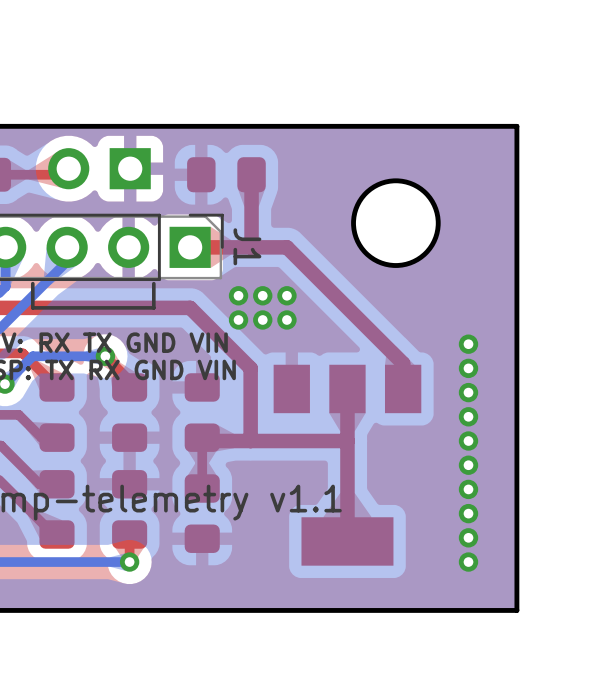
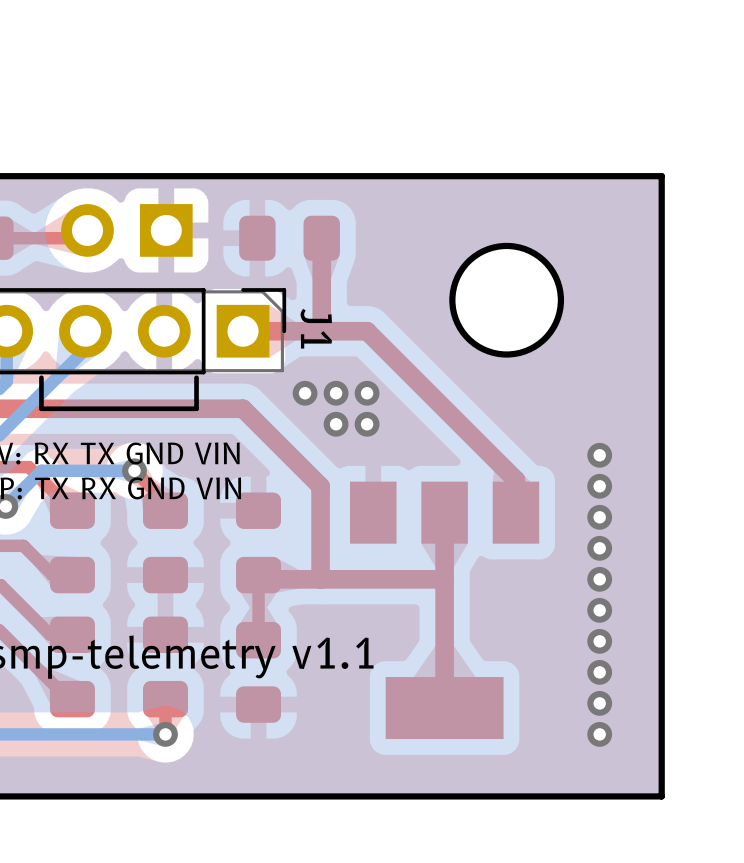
via: (238, 319) -> none

